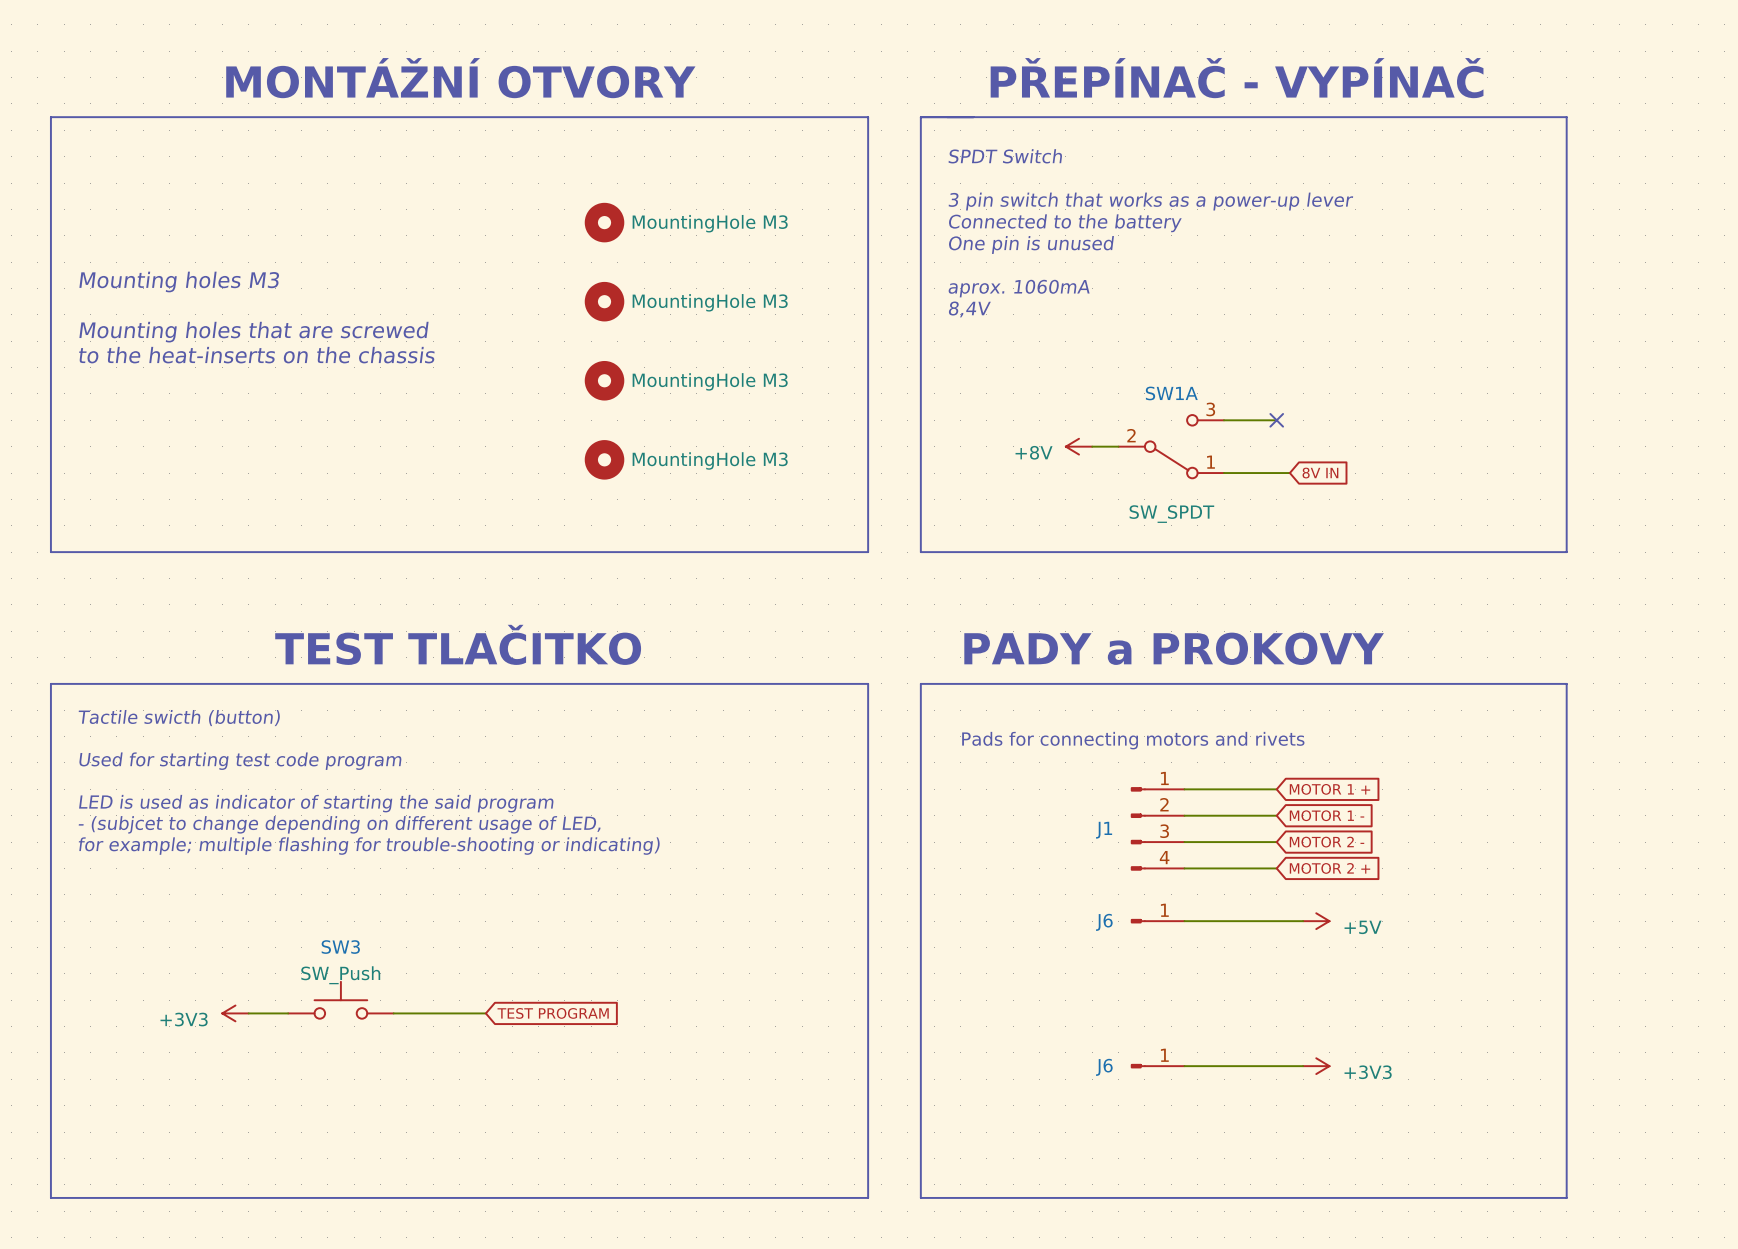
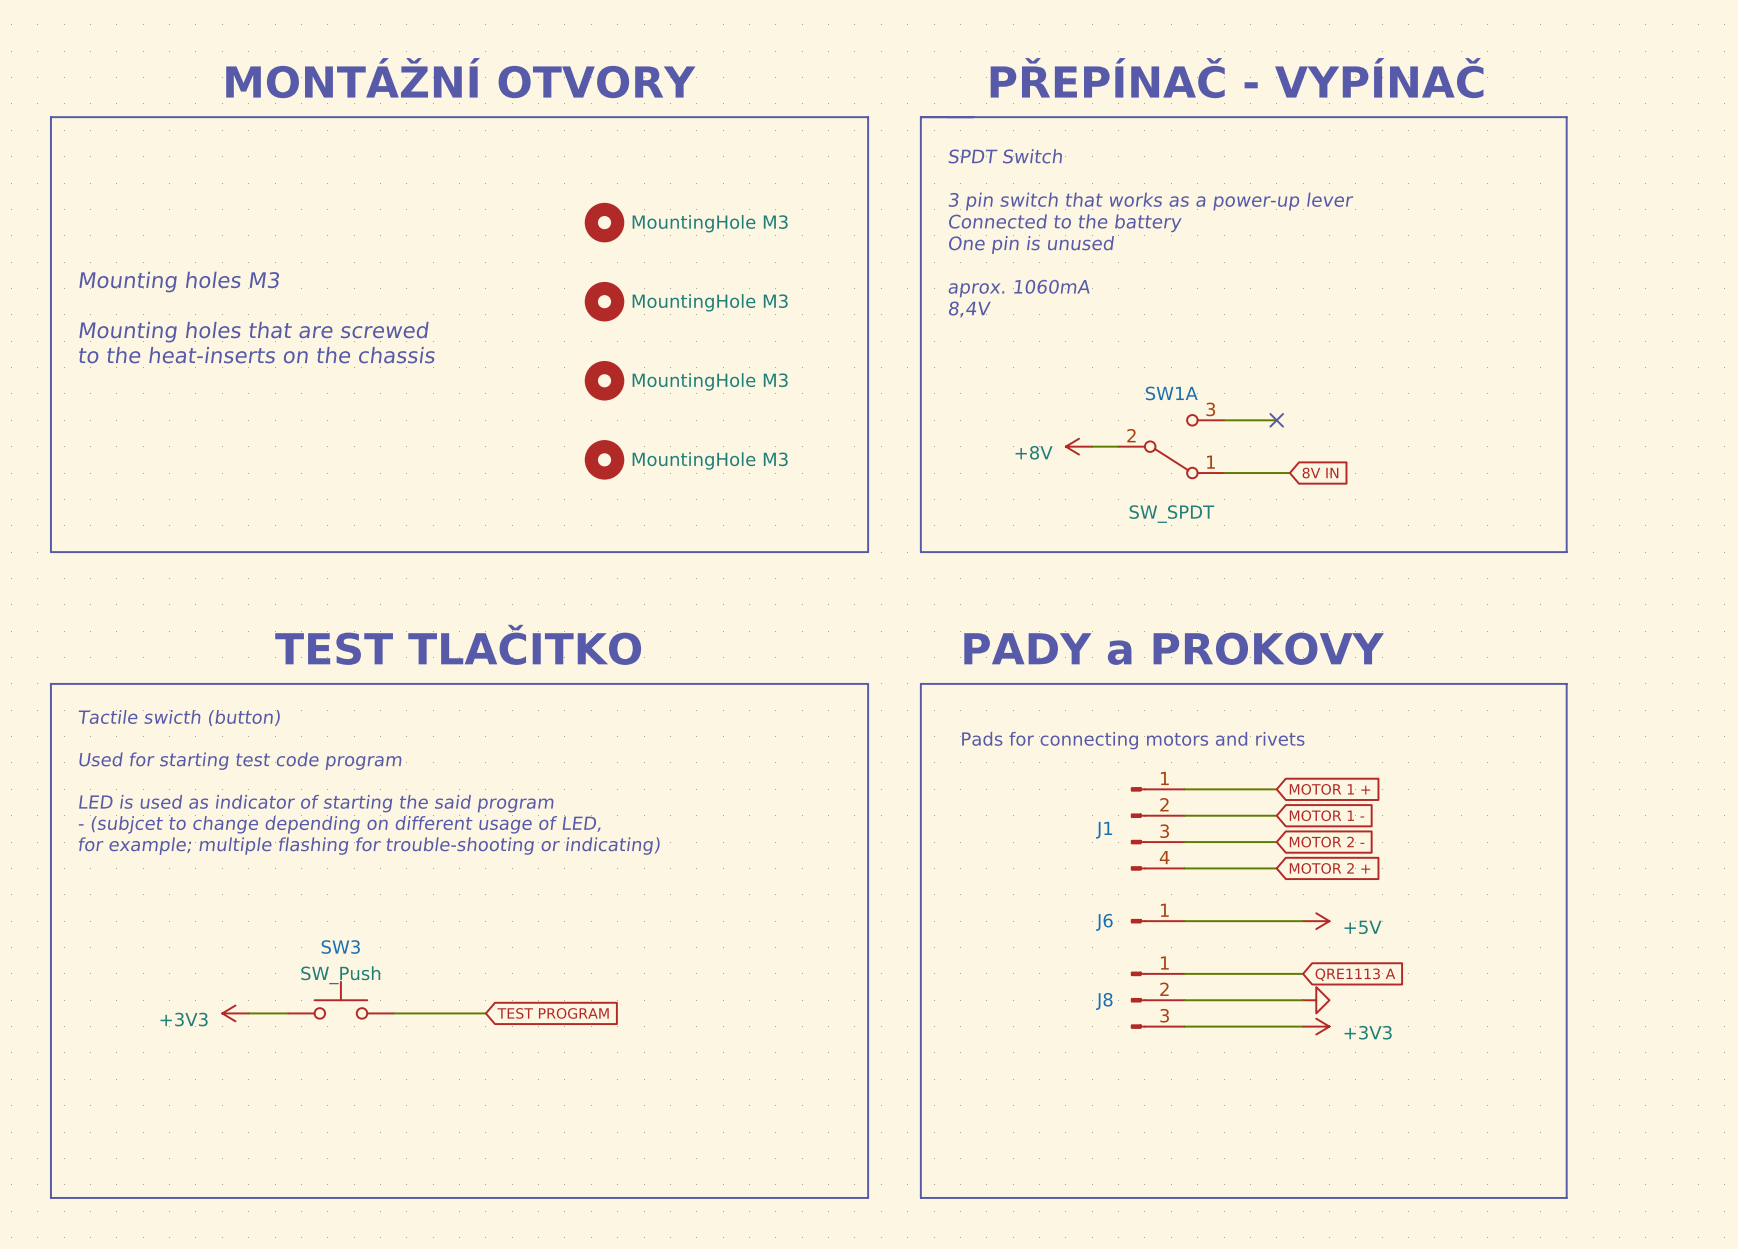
wire: none -> (1184, 973) (1303, 973)
global label: none -> QRE1113 A (1355, 974)
J8: none -> (1157, 1000)
wire: none -> (1184, 1000) (1303, 1000)
power symbol: none -> (1316, 1000)
J6: (1157, 1066) -> none
wire: (1184, 1066) (1303, 1066) -> (1184, 1026) (1303, 1026)
power symbol position: +3V3 (1316, 1066) -> +3V3 (1316, 1026)

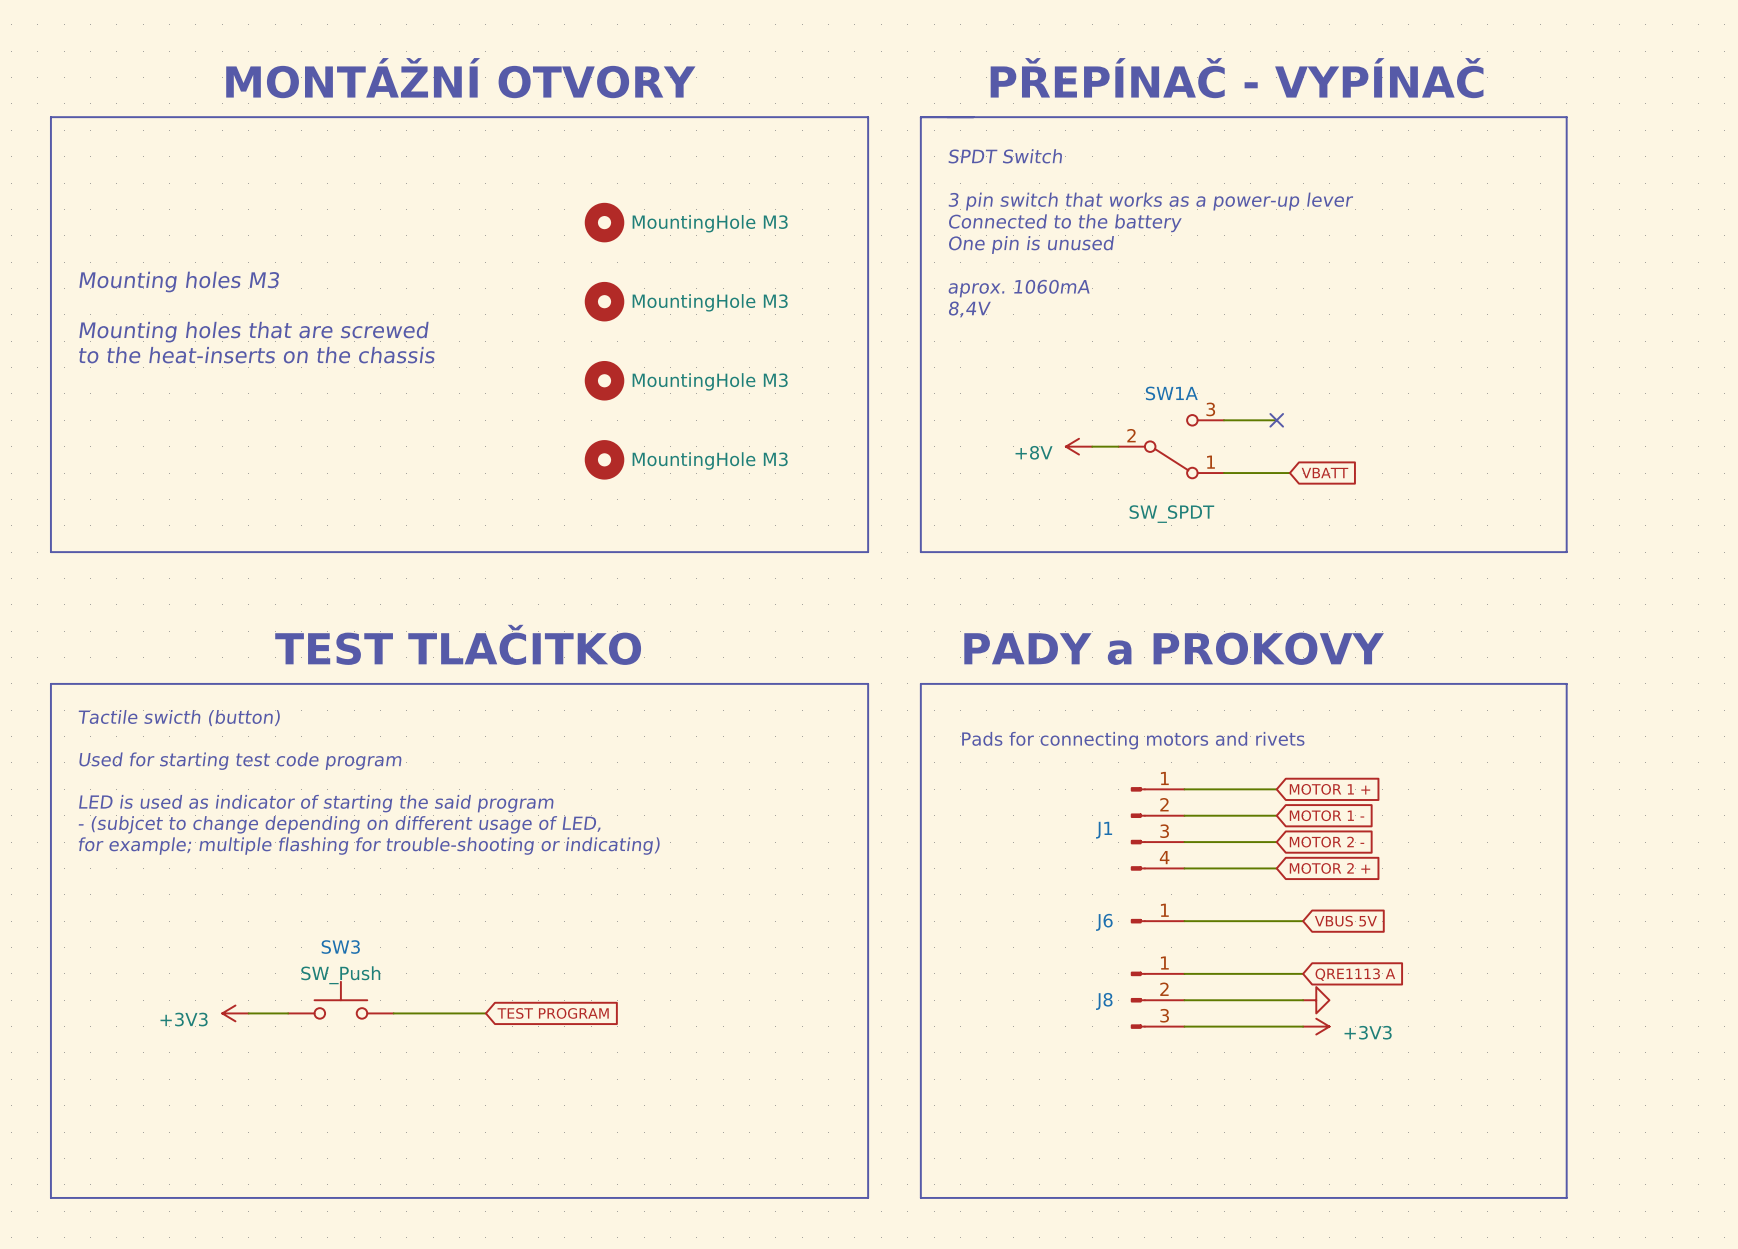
global label: 8V IN (1320, 473) -> VBATT (1324, 473)
power symbol: +5V (1316, 921) -> none
global label: none -> VBUS 5V (1345, 921)

